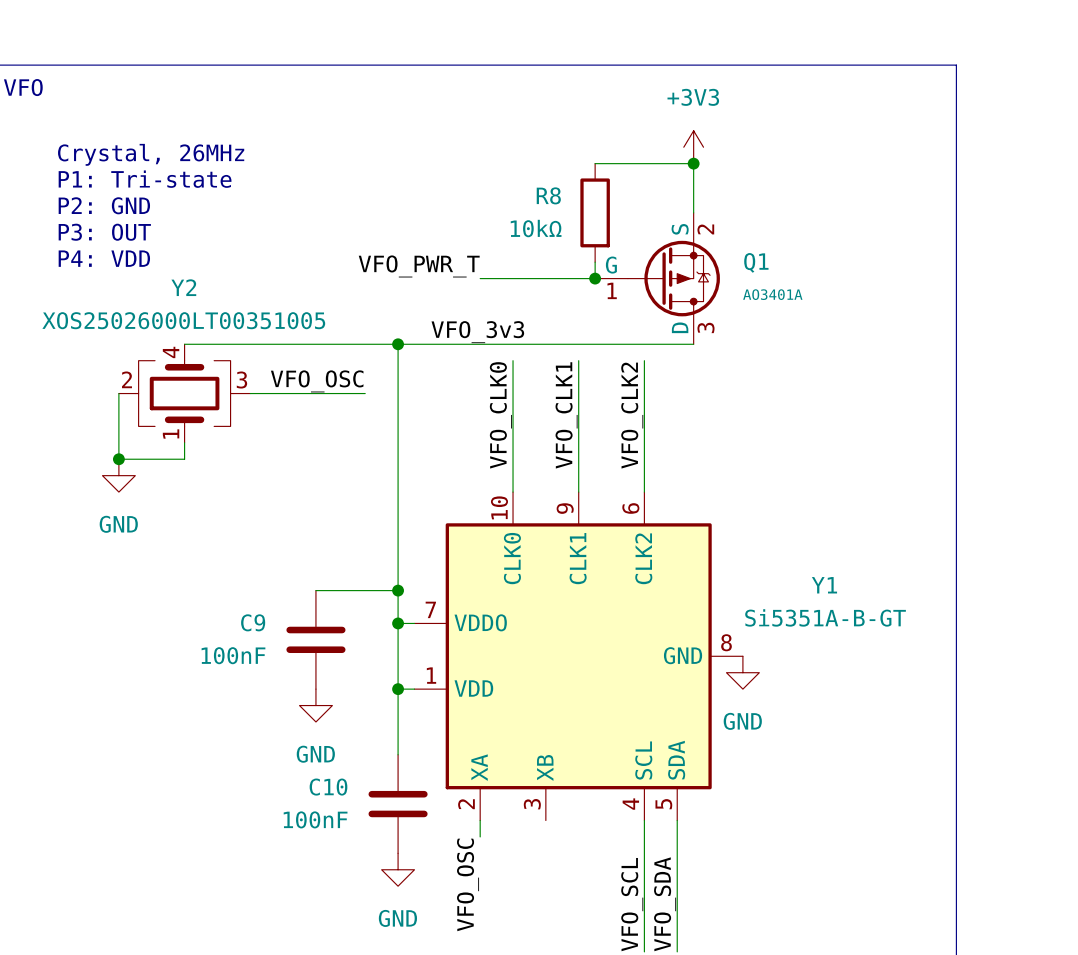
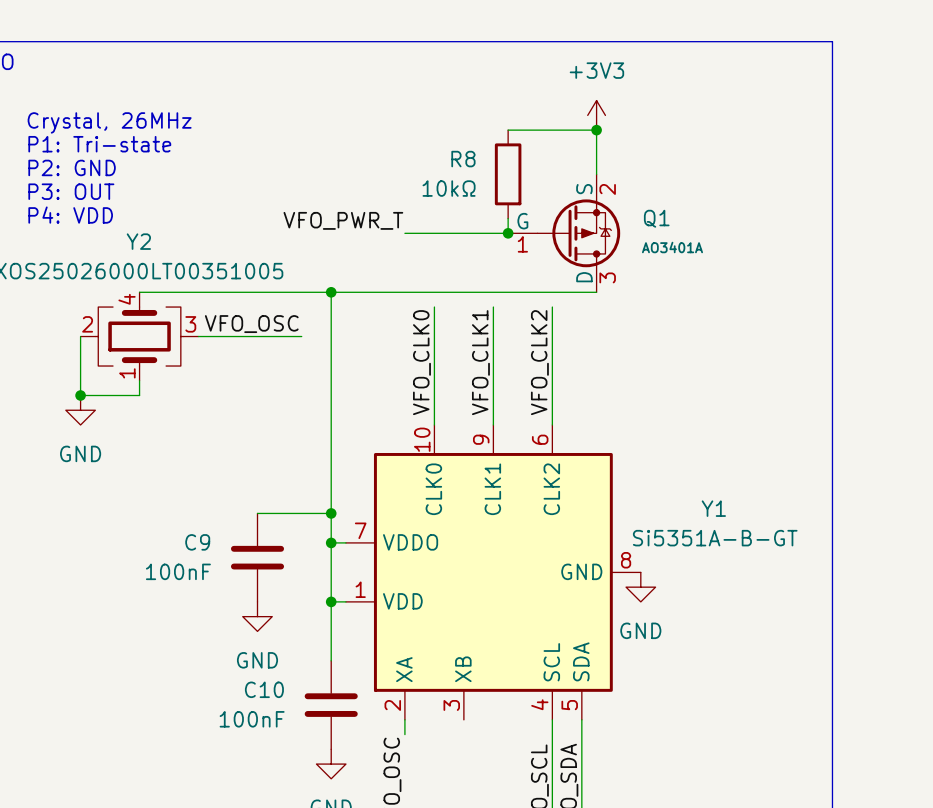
label: VFO_3v3 (477, 332) -> none

